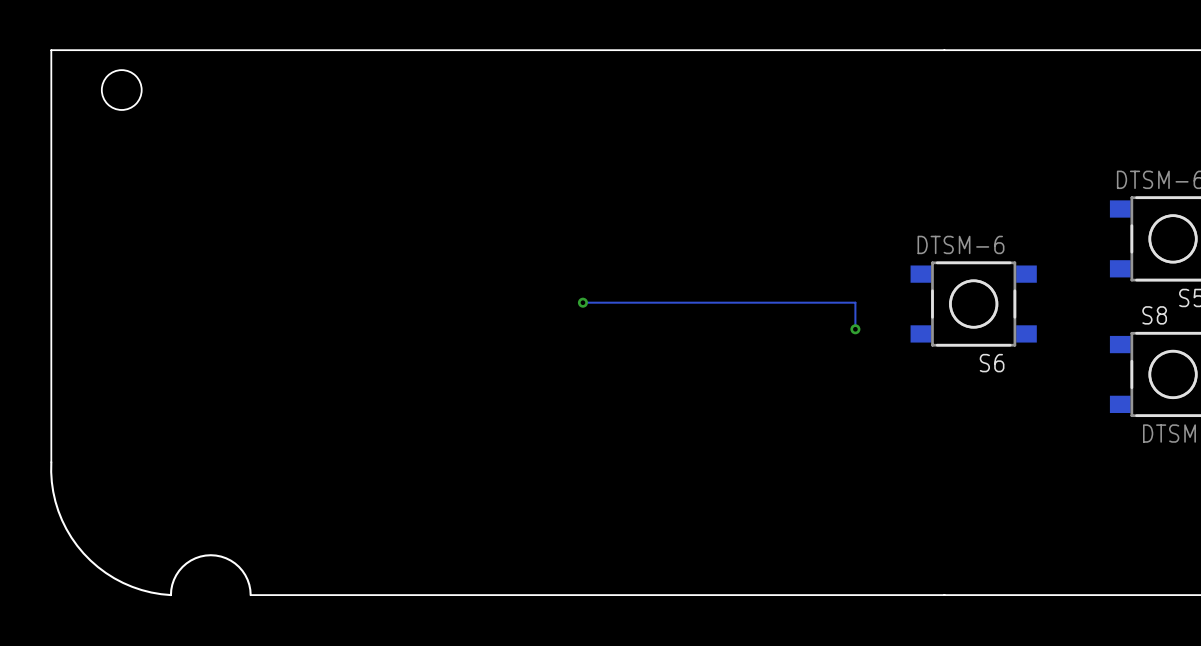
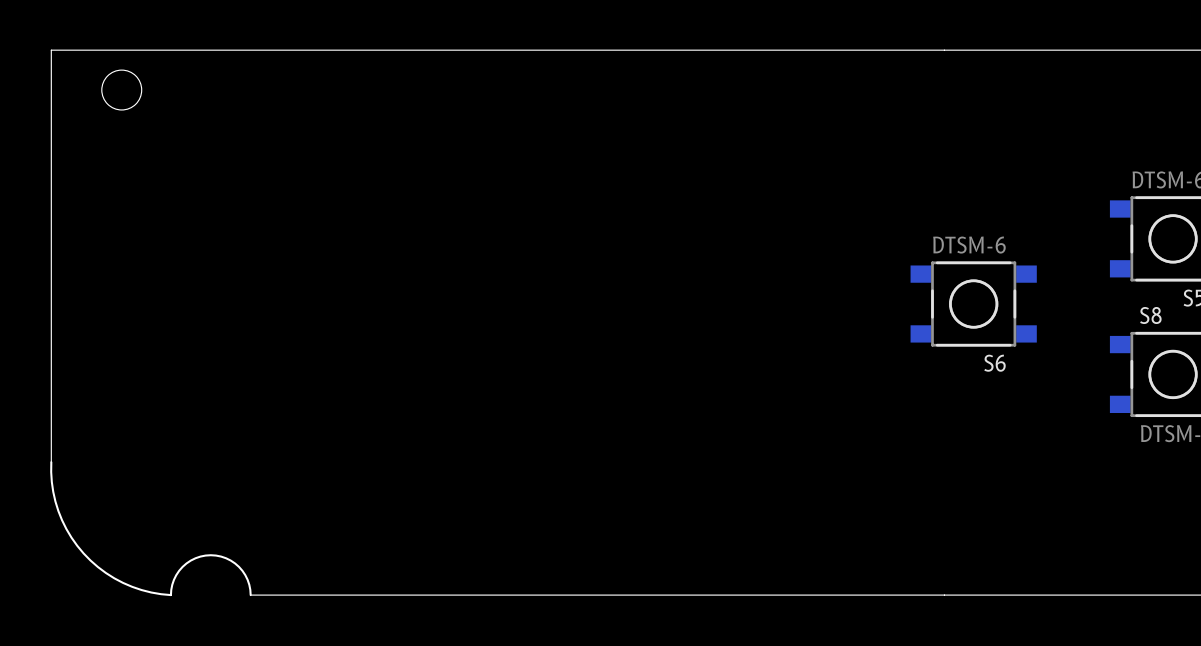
track: (582, 302) (855, 302) (855, 329) -> none
via: (582, 302) -> none
via: (855, 329) -> none

